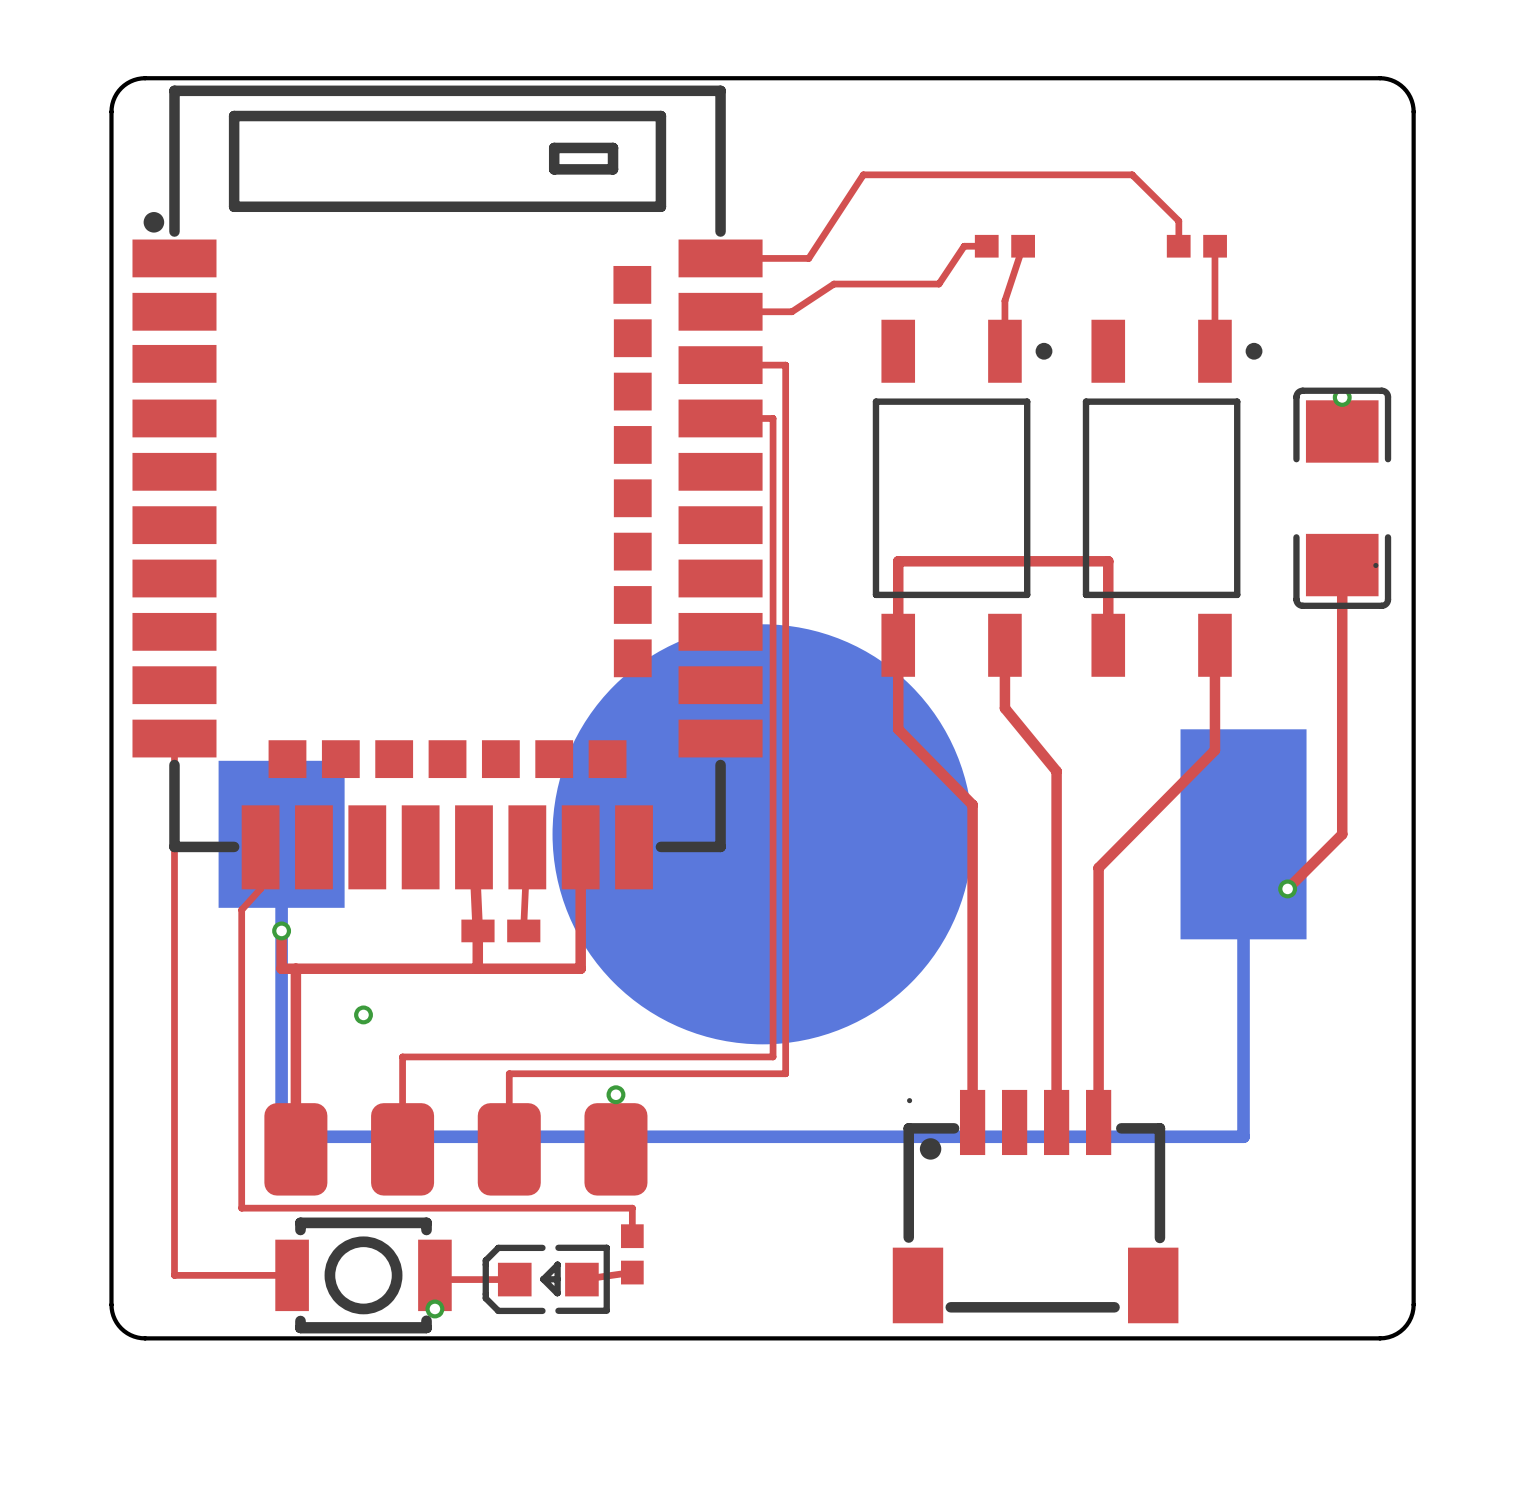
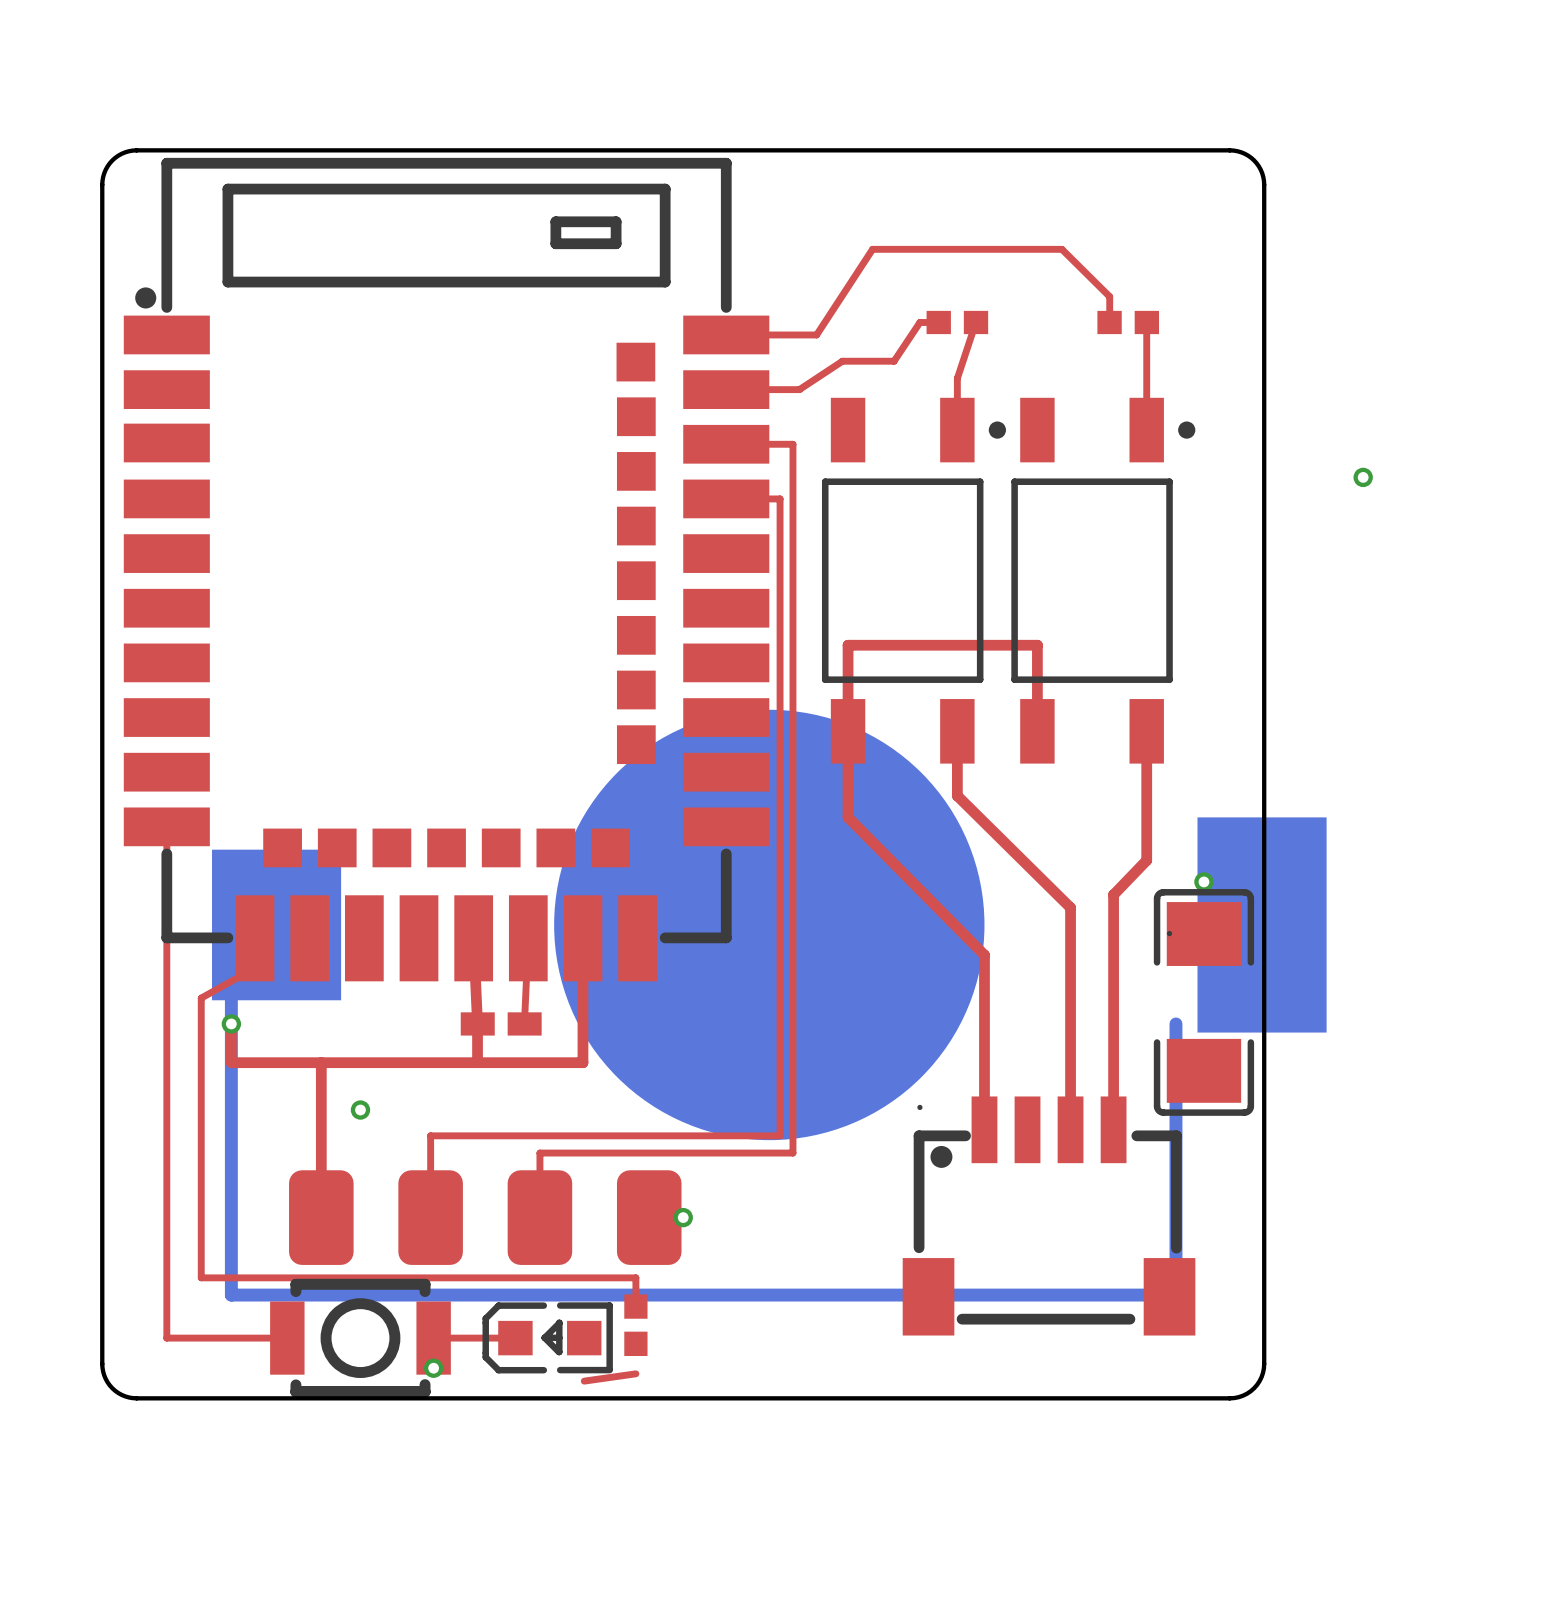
board edge: (1212, 78) (1383, 78) (1394, 81) (1403, 88) (1410, 97) (1413, 108) (1413, 1304) (1411, 1317) (1403, 1328) (1392, 1335) (1380, 1338) (145, 1338) (127, 1333) (114, 1319) (111, 1308) (111, 1262) -> (1229, 150) (1244, 153) (1254, 160) (1260, 169) (1264, 184) (1264, 1363) (1261, 1377) (1254, 1388) (1242, 1395) (1229, 1398) (136, 1398) (125, 1396) (112, 1388) (104, 1375) (102, 1363)
top track: (1048, 174) (1132, 174) (1178, 221) (1178, 246) -> (1061, 249) (1109, 296) (1109, 322)
part: none -> (957, 322)
top track: (986, 246) (964, 246) (938, 284) (884, 284) -> (938, 322) (919, 322) (894, 361)
part: (1004, 246) -> none
top track: (1022, 246) (1004, 300) (1004, 351) -> (975, 322) (957, 378) (957, 430)
part: none -> (1128, 322)
part: (1196, 246) -> none
top track: (1214, 246) (1214, 351) -> (1146, 322) (1146, 430)
part position: (962, 498) -> (913, 580)
part: none -> (1103, 580)
part: (1172, 498) -> none
part rotation: 0° (1342, 498) -> 180° (1203, 1002)
part position: (1342, 498) -> (1203, 1002)
top track: (898, 561) (898, 729) (972, 804) (972, 863) -> (908, 645) (848, 645) (848, 817) (984, 955)
top track: (1024, 561) (1108, 561) (1108, 645) -> (1037, 645) (1037, 731)
top track: (1342, 565) (1342, 834) (1287, 888) -> none
top track: (1004, 645) (1004, 708) (1056, 771) (1056, 817) -> (957, 731) (957, 795) (1070, 907)
top track: (1214, 645) (1214, 750) (1098, 867) -> (1146, 731) (1146, 860) (1113, 894) (1113, 959)
top track: (260, 876) (260, 888) (241, 909) (241, 1208) (632, 1208) (632, 1236) -> (255, 968) (201, 998) (201, 1277) (635, 1277) (635, 1306)
via position: (1287, 888) -> (1203, 881)
bottom track: none -> (231, 1023) (231, 989) (231, 1295) (1175, 1295) (1175, 1023)
top track: (281, 930) (281, 968) -> (231, 1023) (231, 1062) (276, 1062)
bottom track: (281, 930) (281, 897) (281, 1136) (1243, 1136) (1243, 930) -> none
via position: (281, 930) -> (231, 1023)
top track: (295, 968) (295, 1103) -> none
top track: none -> (321, 1062) (321, 1170)
top track: (972, 1002) (972, 1090) -> none
top track: (1056, 1002) (1056, 1090) -> none
top track: (1098, 1002) (1098, 1090) -> none
top track: (773, 1040) (773, 1056) -> (792, 1153) (780, 1153)
top track: none -> (780, 1135) (430, 1135) (430, 1170)
top track: (538, 1056) (402, 1056) (402, 1103) -> (539, 1153) (539, 1170)
top track: (785, 1056) (785, 1073) (509, 1073) (509, 1103) -> none
via position: (615, 1094) -> (683, 1217)
part position: (455, 1149) -> (485, 1217)
part position: (1035, 1206) -> (1049, 1215)
top track: (174, 1237) (174, 1275) (292, 1275) -> (166, 1338) (287, 1338)
part position: (632, 1254) -> (635, 1325)
part position: (363, 1275) -> (360, 1338)
top track: (451, 1279) (514, 1279) -> (450, 1338) (515, 1338)
part position: (546, 1279) -> (547, 1337)
via position: (434, 1308) -> (433, 1368)

